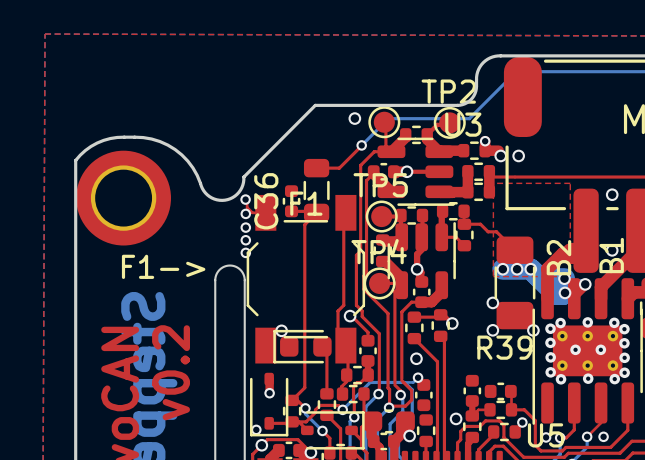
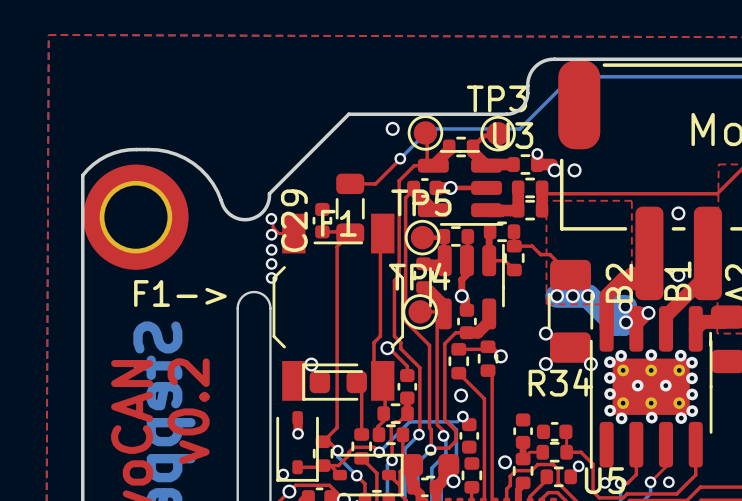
TP2 name: TP2 (448, 91) -> TP3 (496, 98)
C36 name: C36 (266, 201) -> C29 (294, 220)
R39 name: R39 (504, 347) -> R34 (559, 382)

